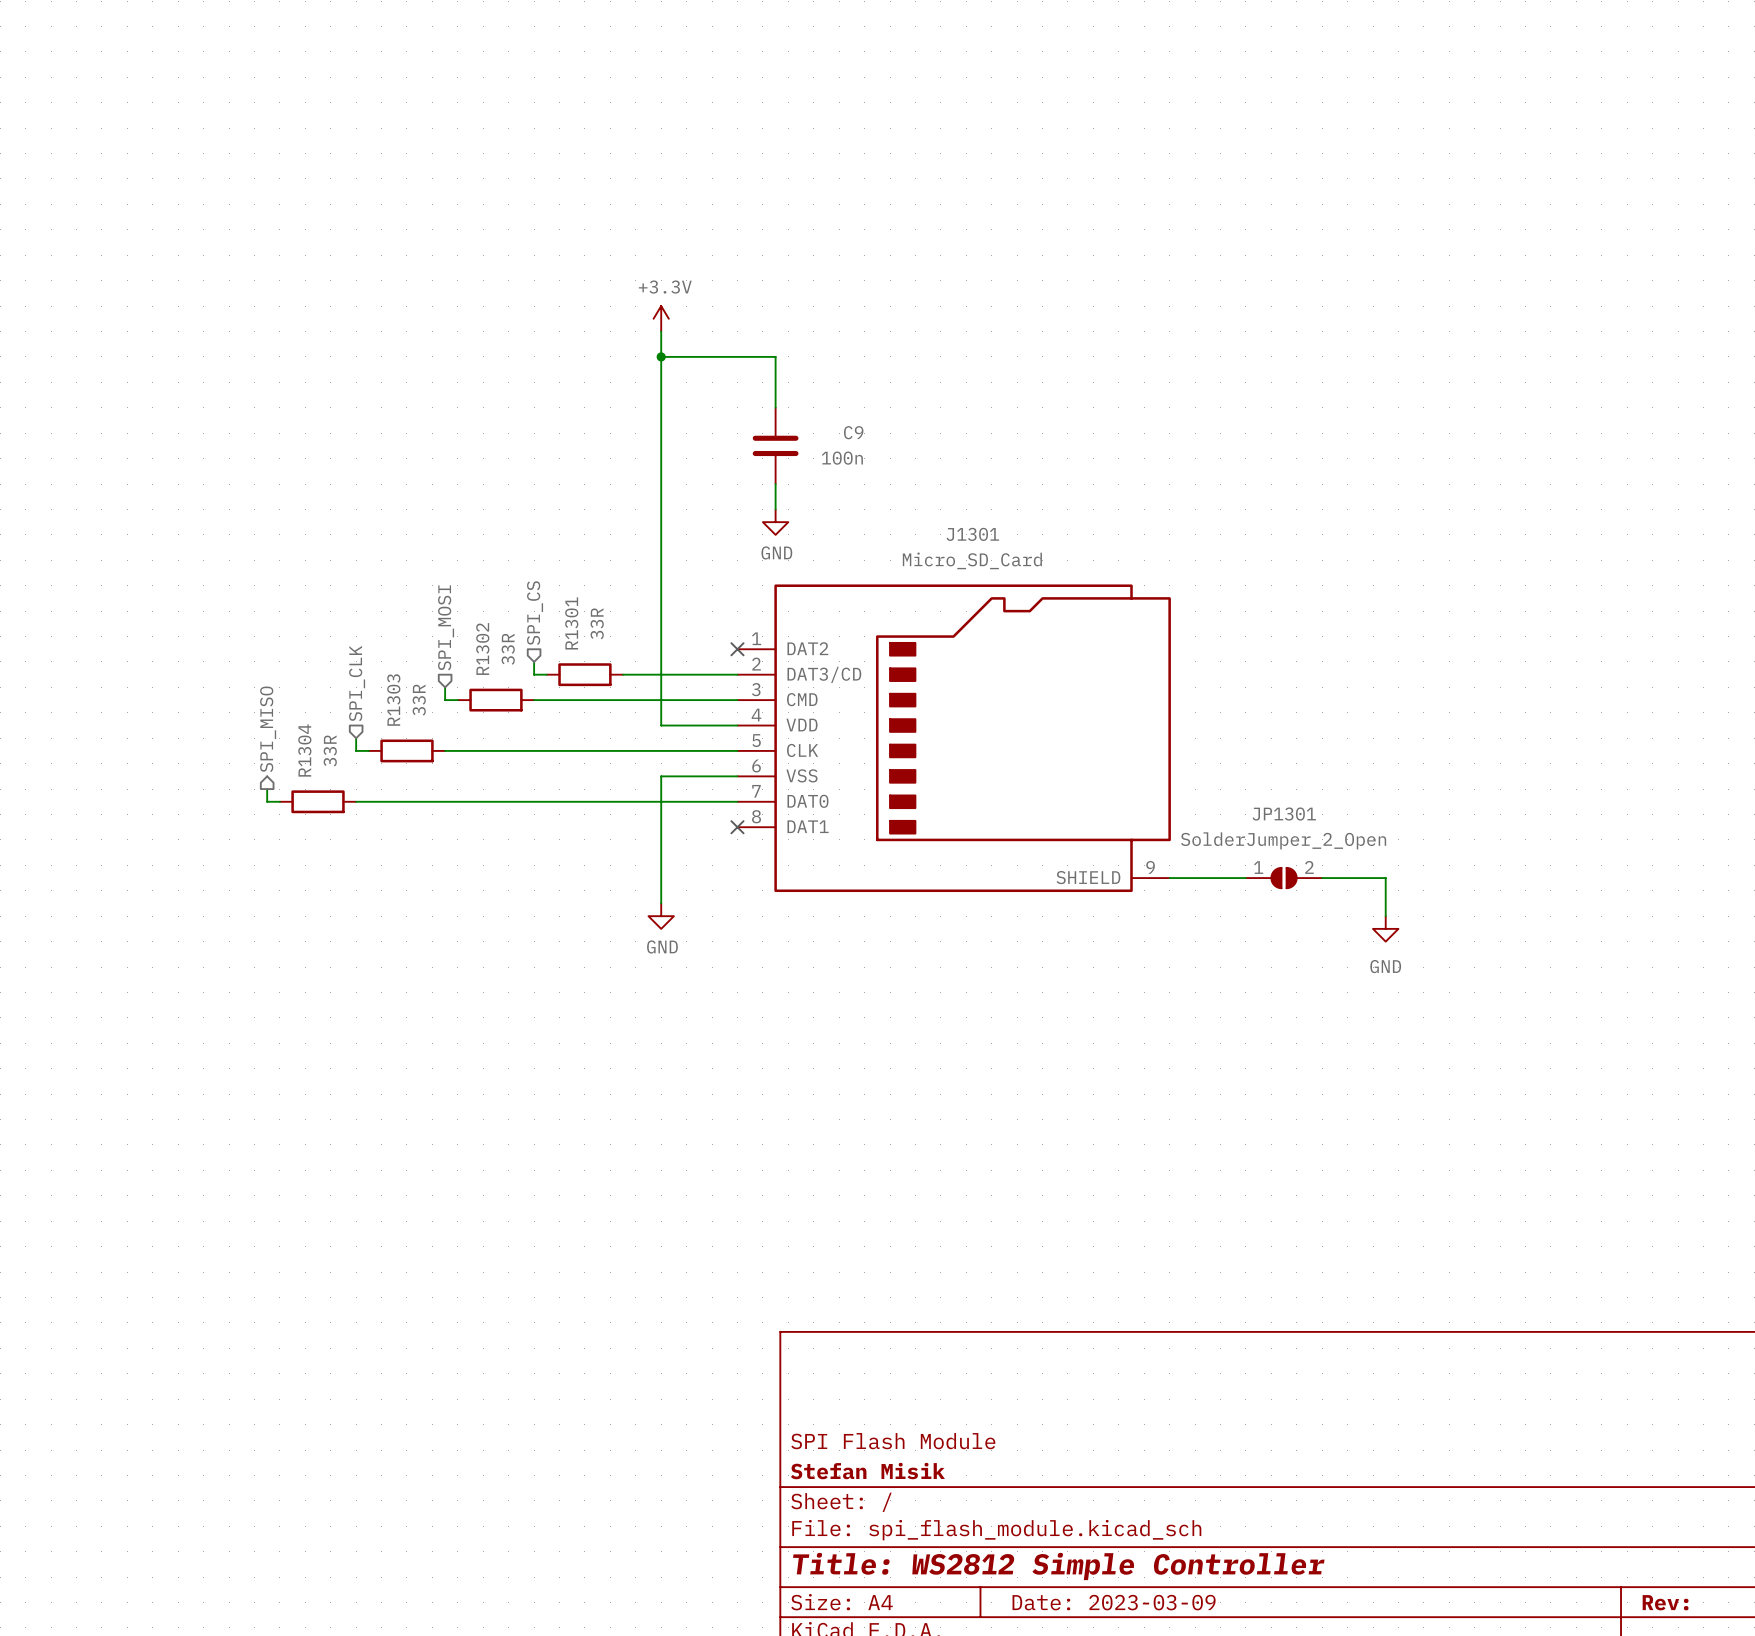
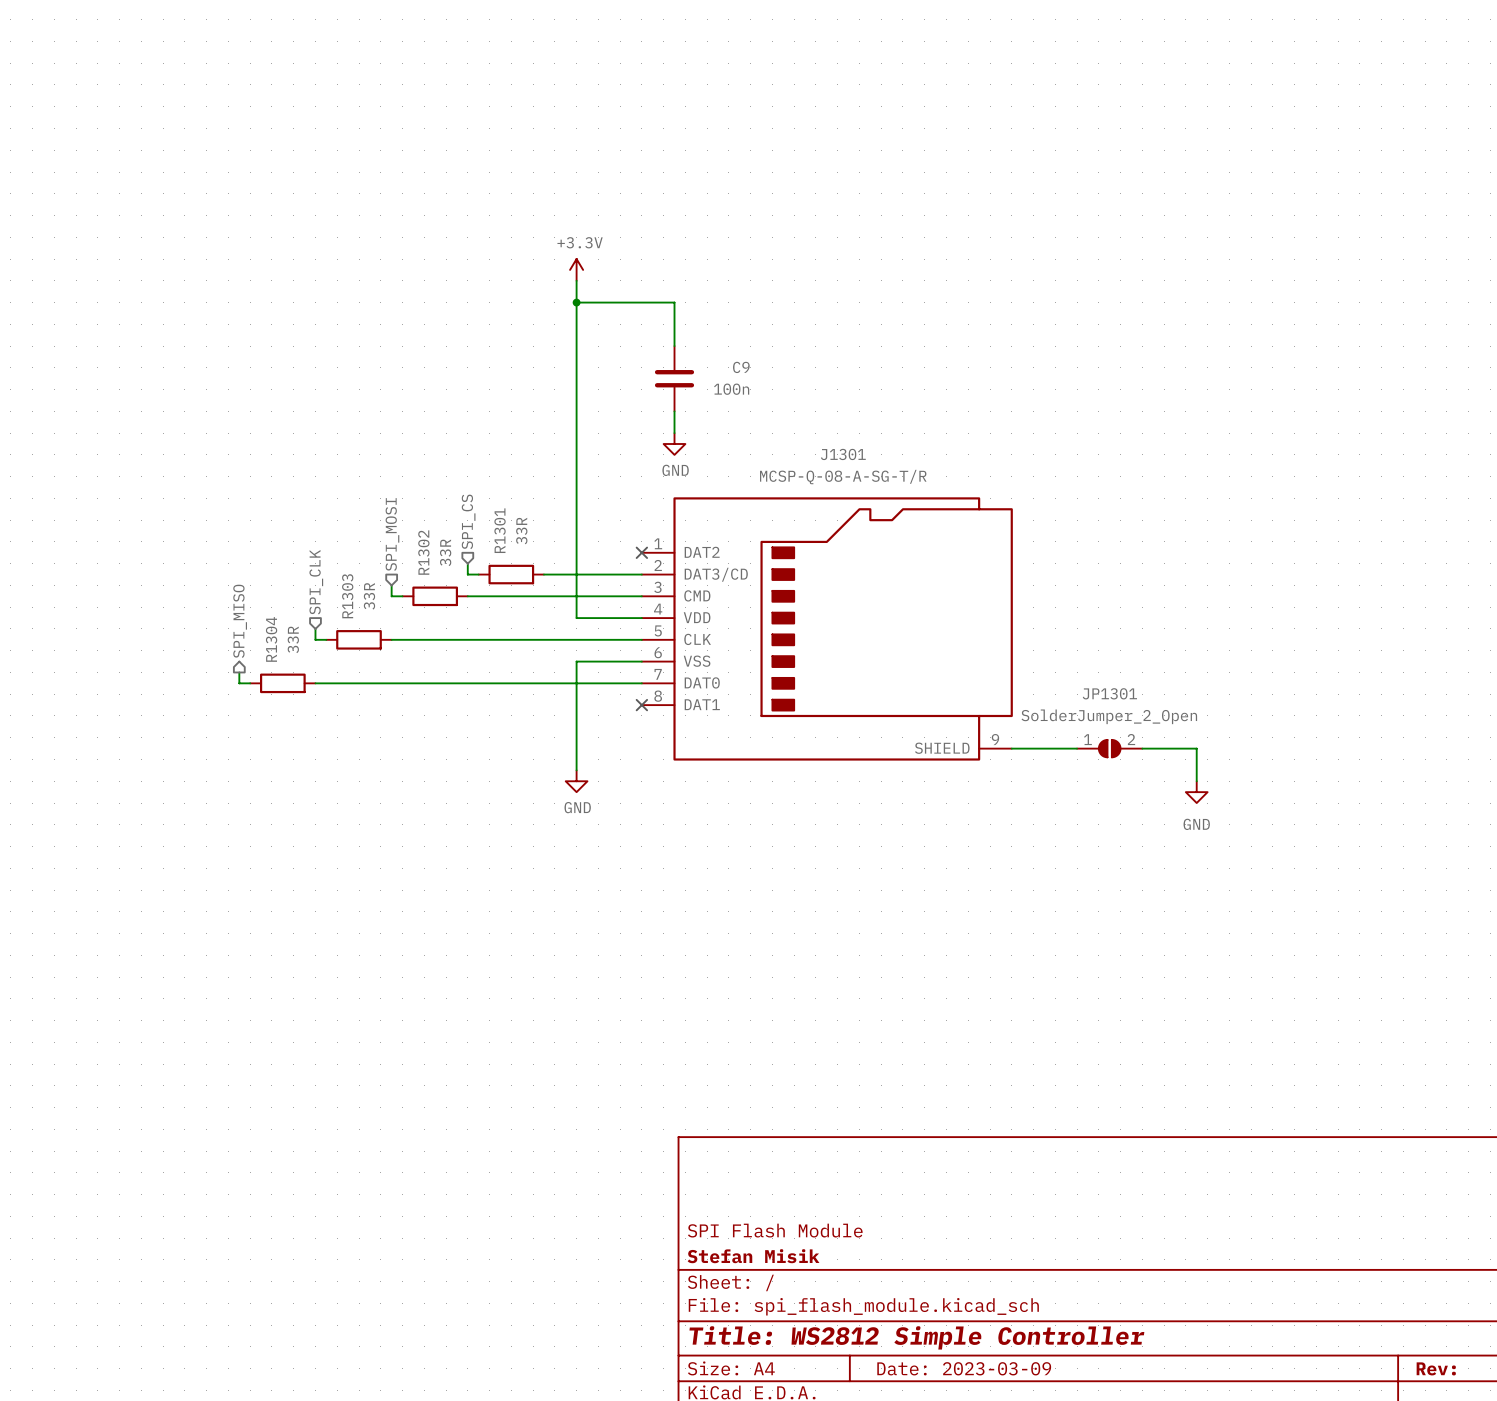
J1301 value: Micro_SD_Card (972, 560) -> MCSP-Q-08-A-SG-T/R (843, 477)

